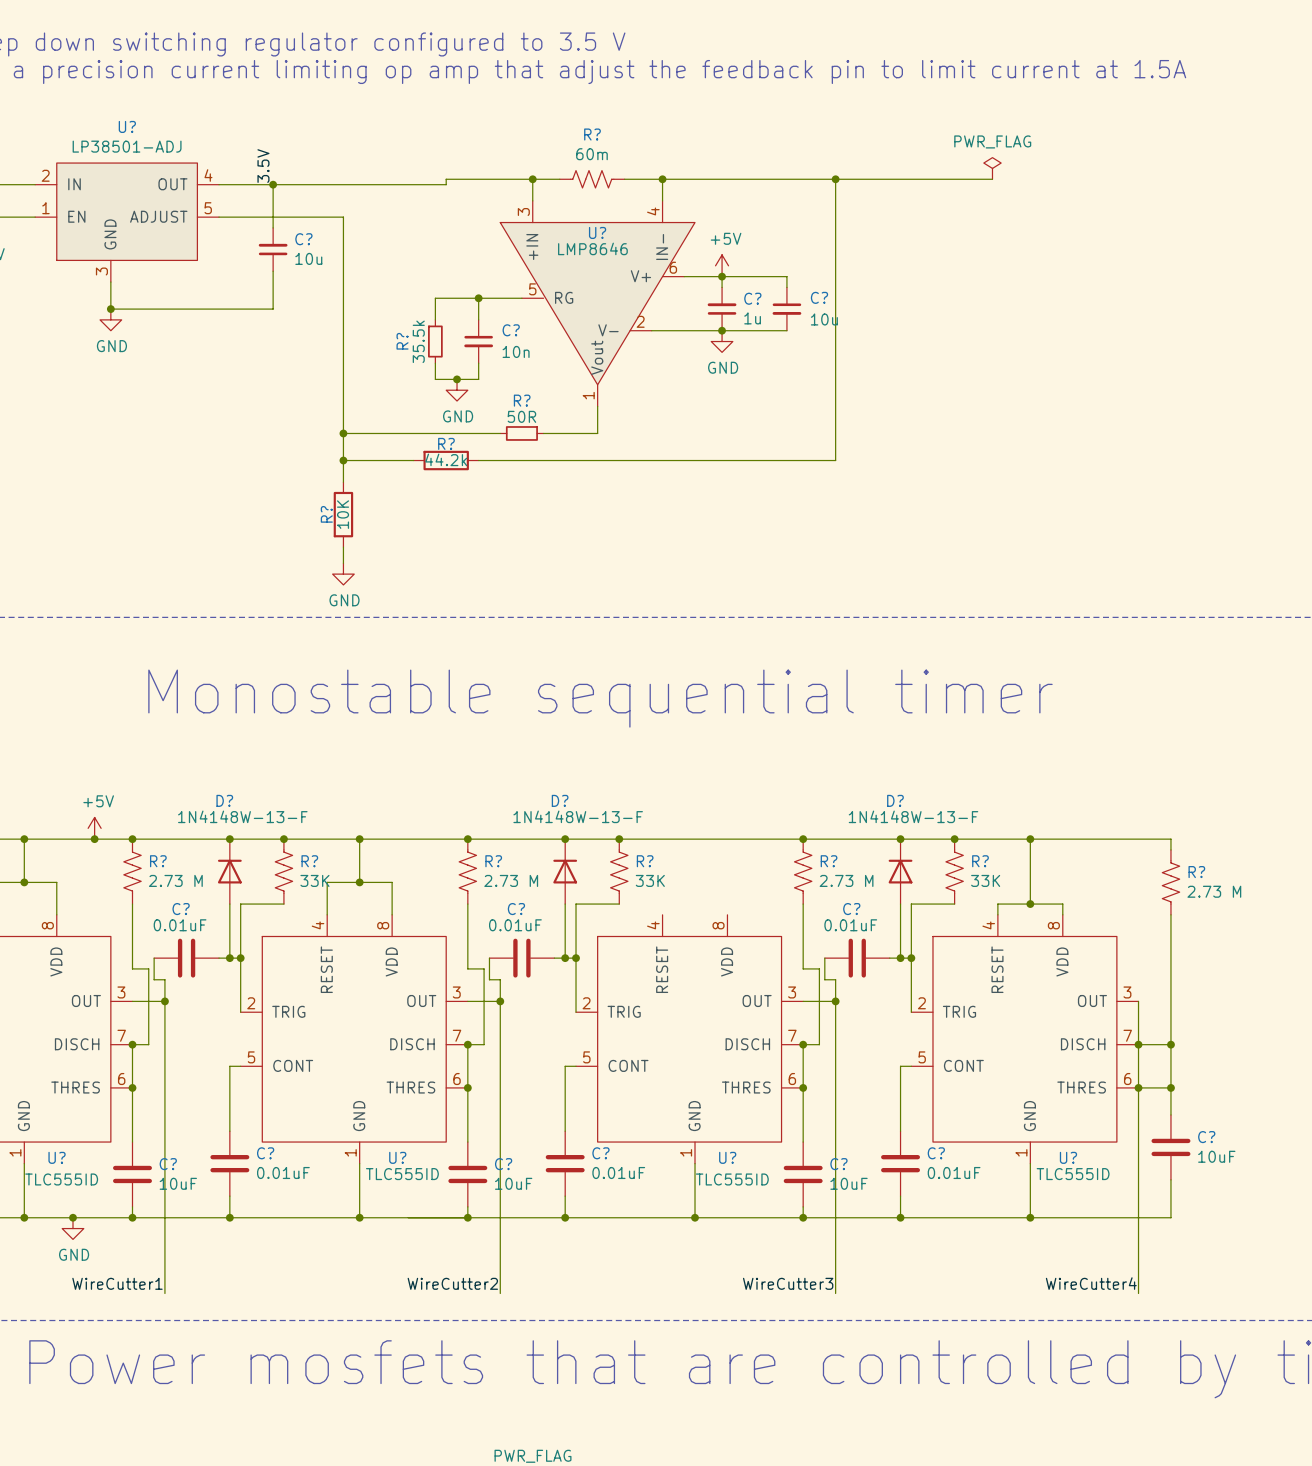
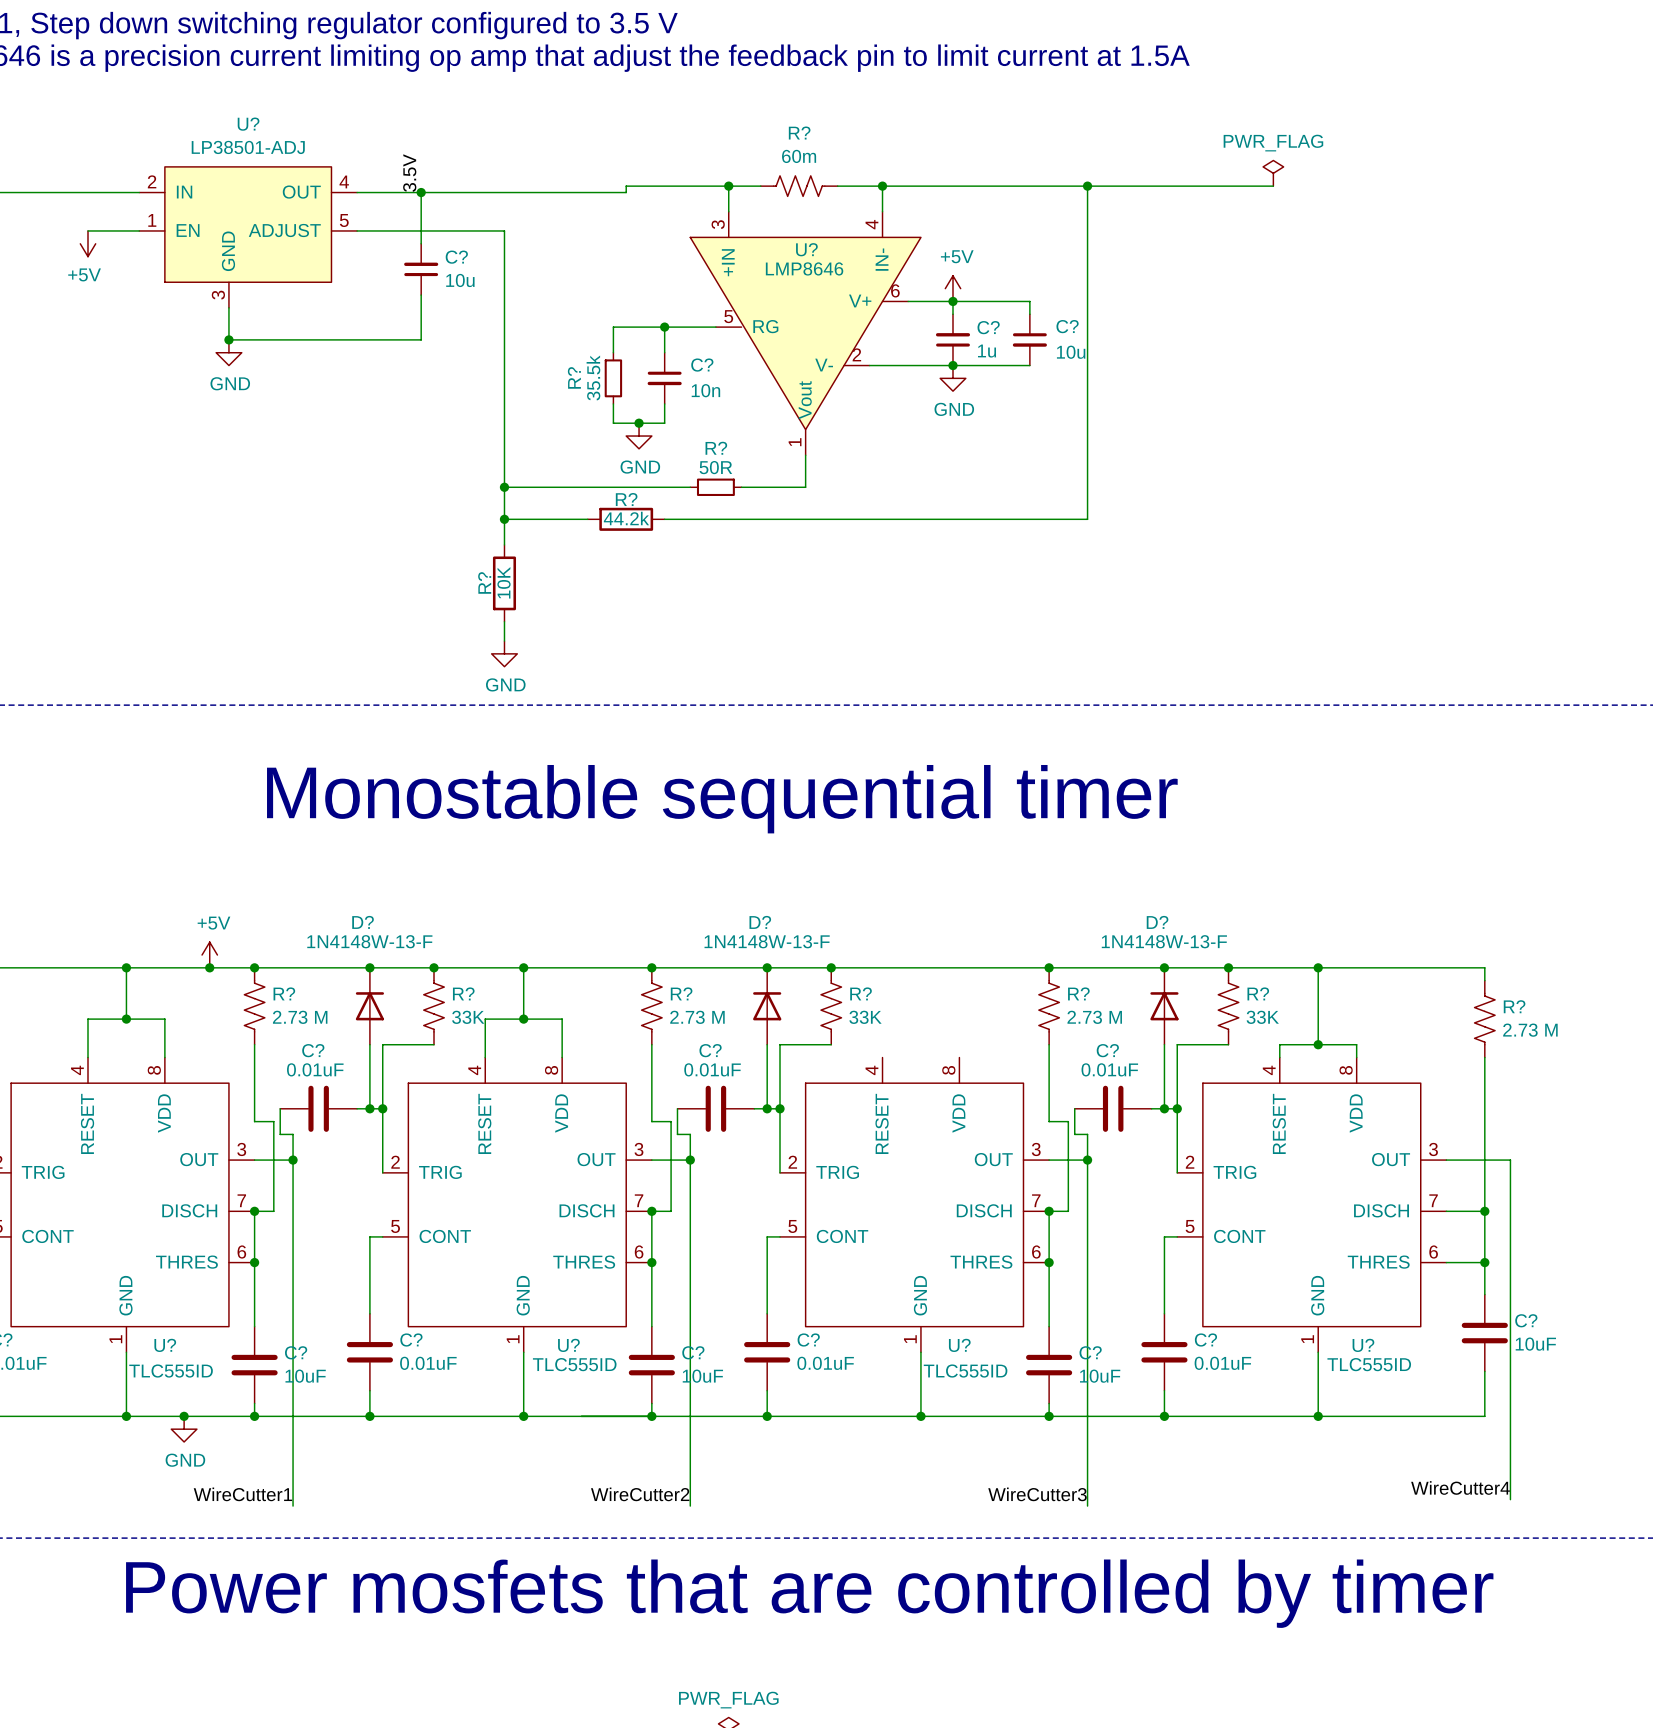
wire: (1138, 1001) (1138, 1293) -> (1446, 1160) (1510, 1160) (1510, 1499)
junction: (1138, 1044) -> none
junction: (1138, 1087) -> none
label position: WireCutter4 (1091, 1283) -> WireCutter4 (1460, 1487)

